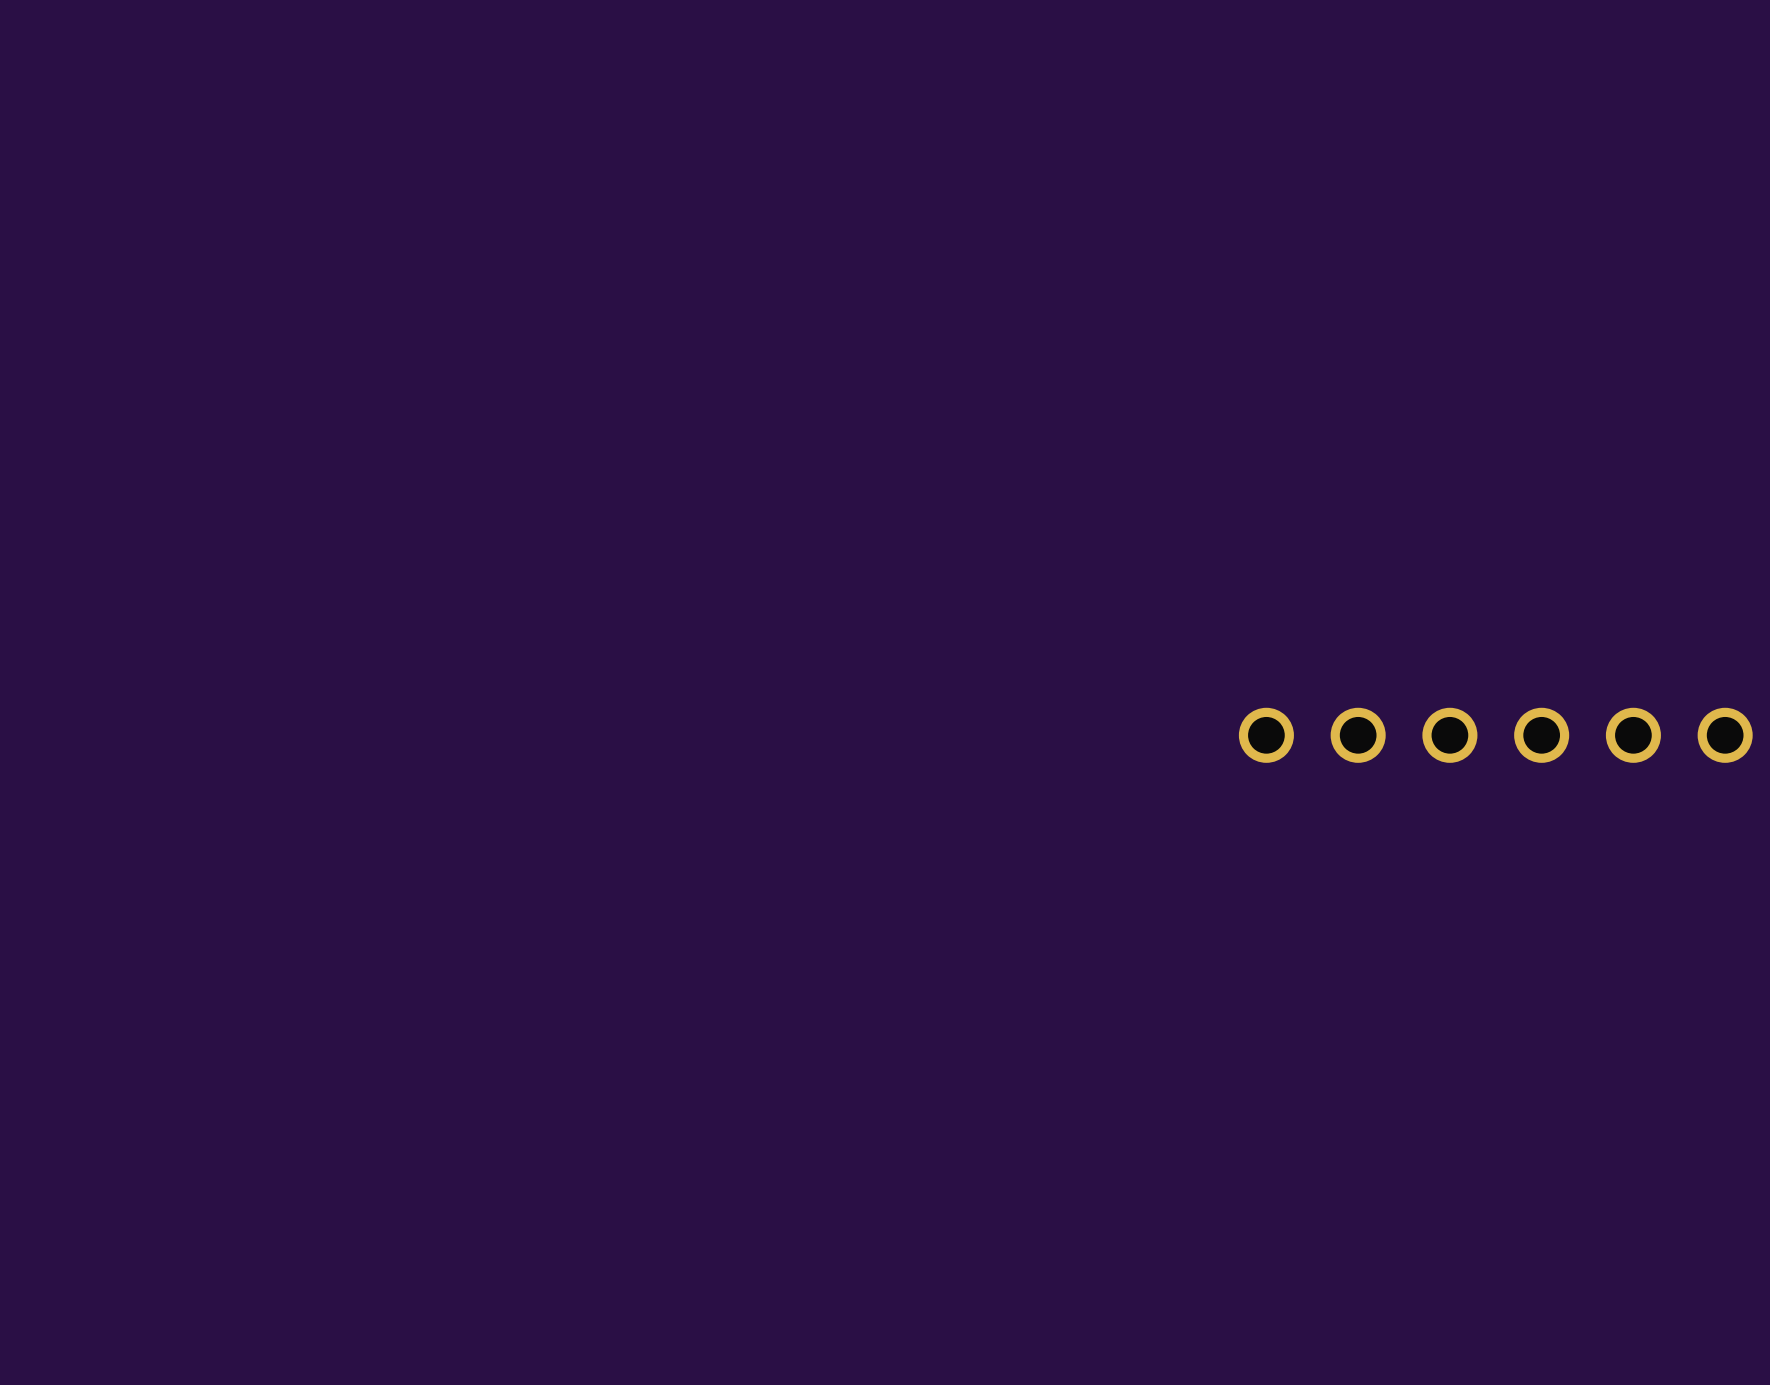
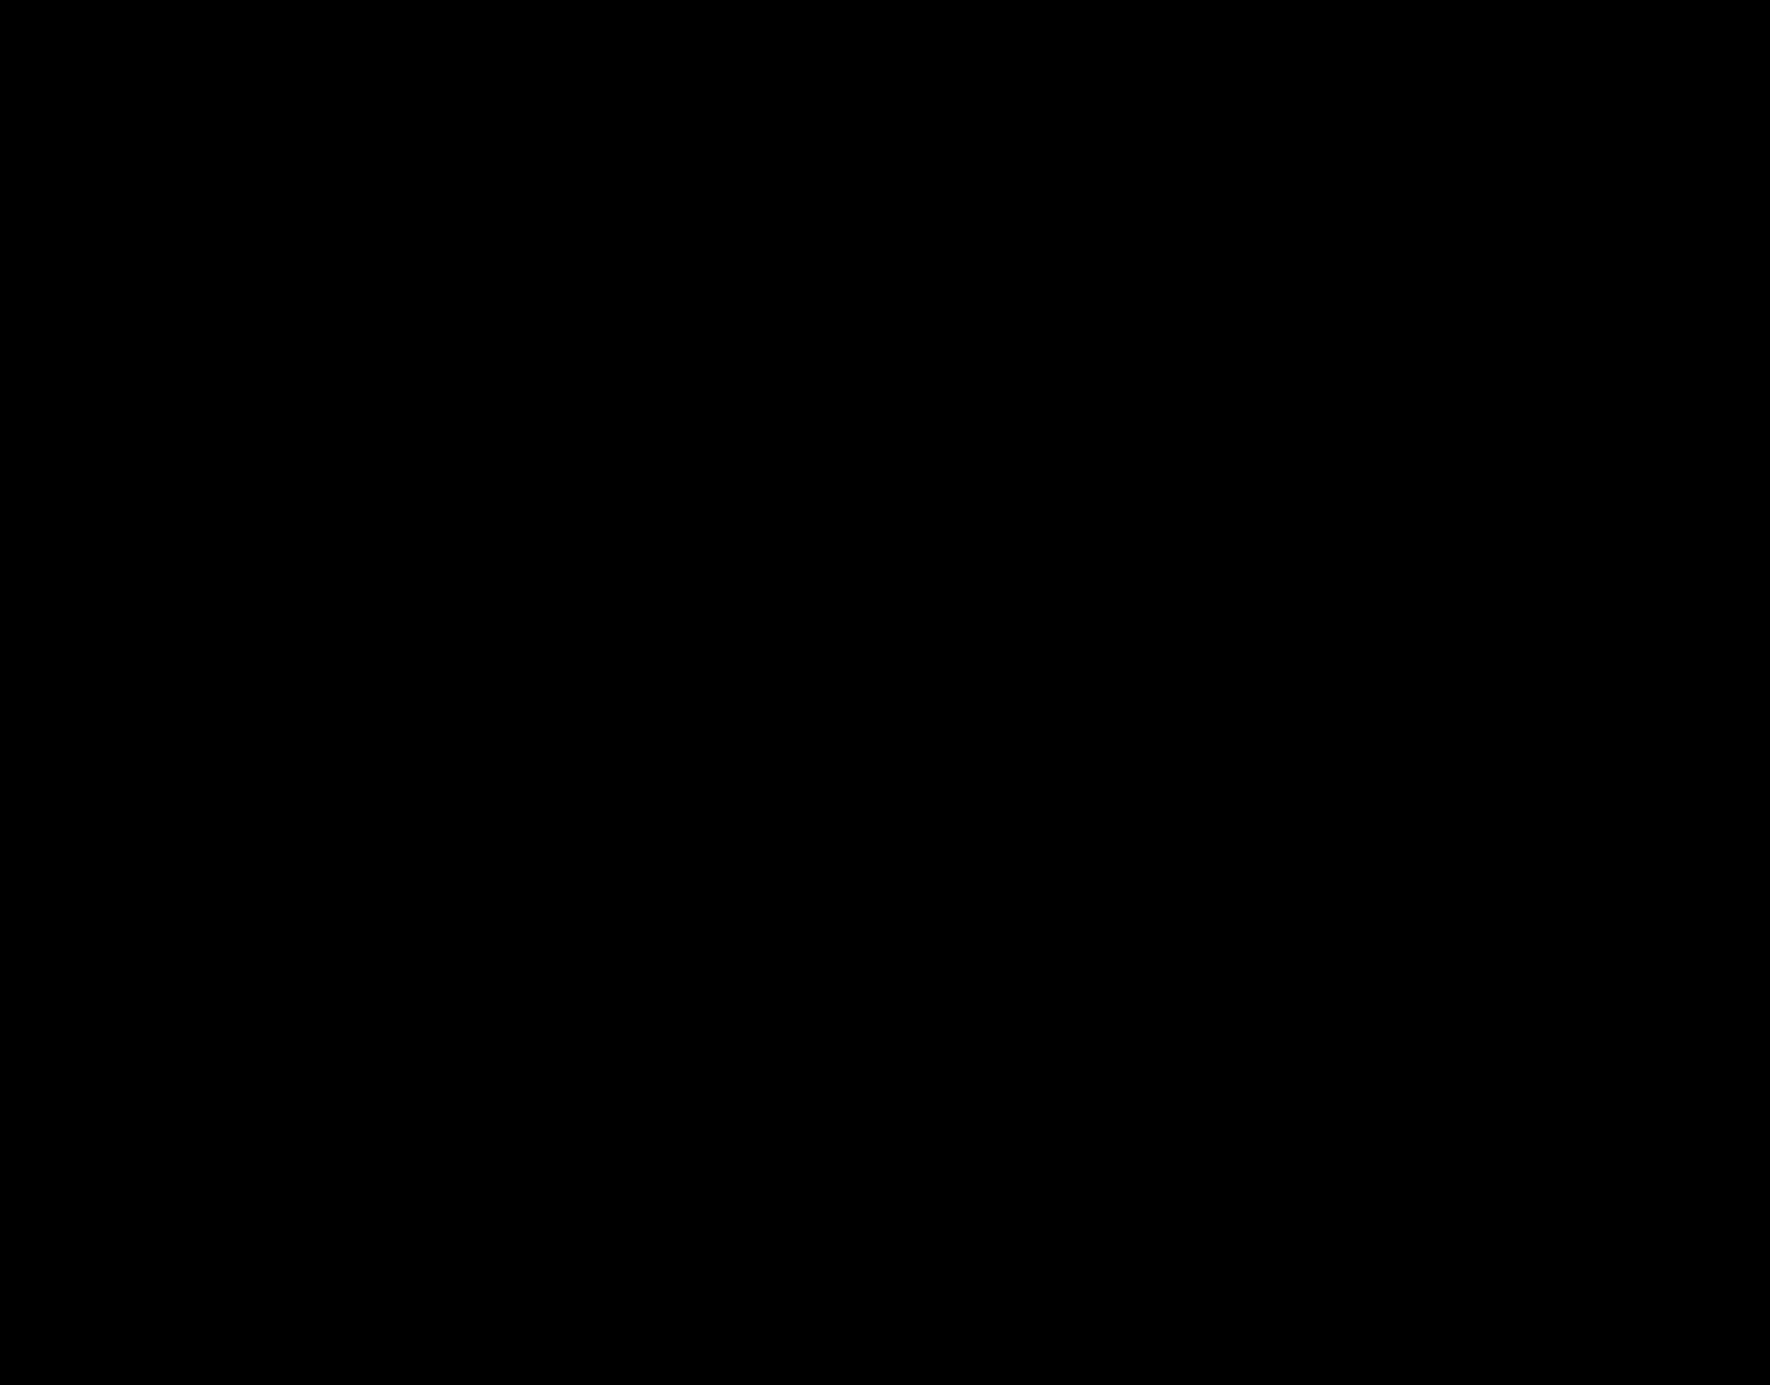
part: (1495, 735) -> none

